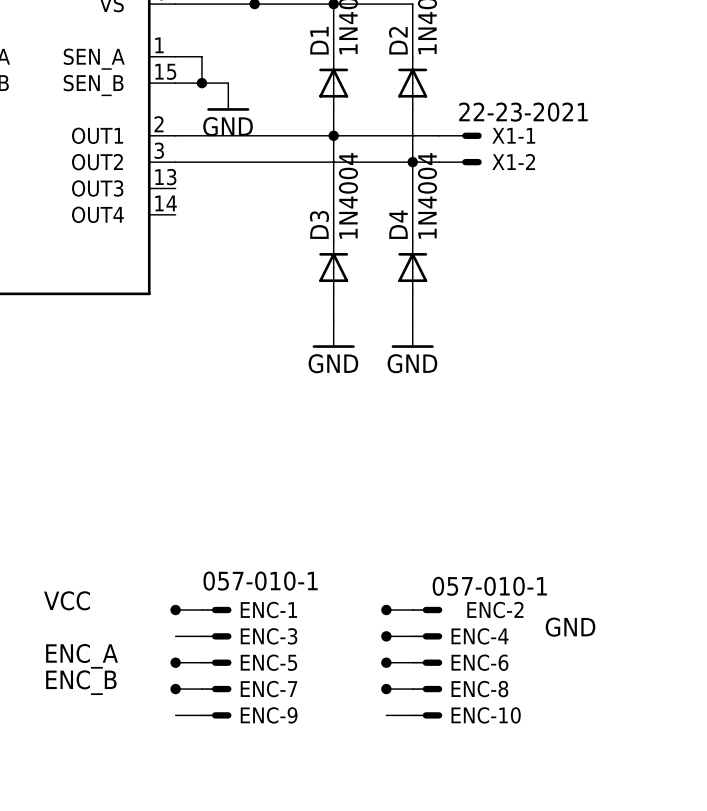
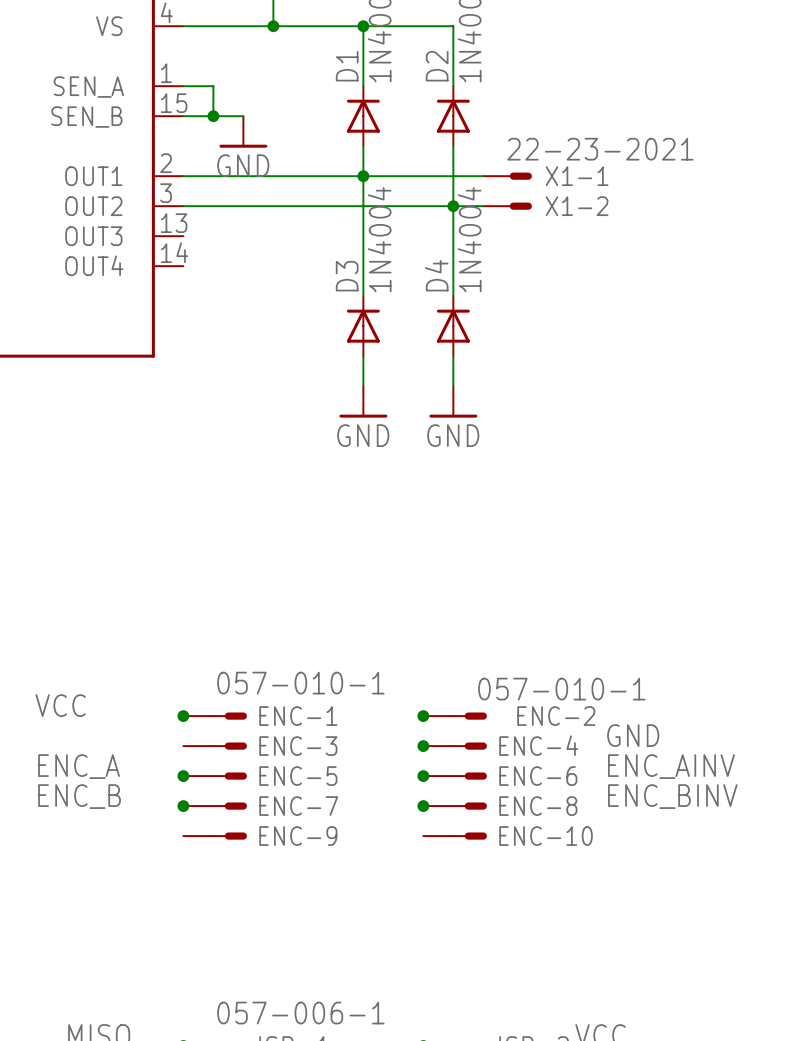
label: none -> ENC_AINV (671, 766)
label: none -> ENC_BINV (672, 796)

